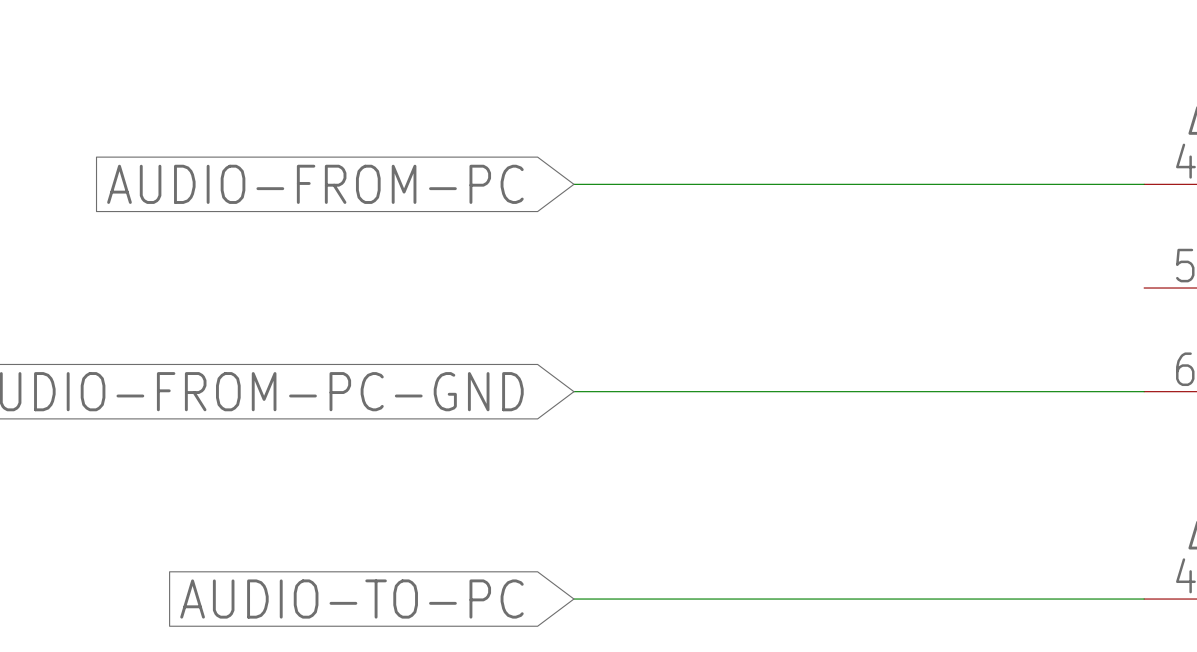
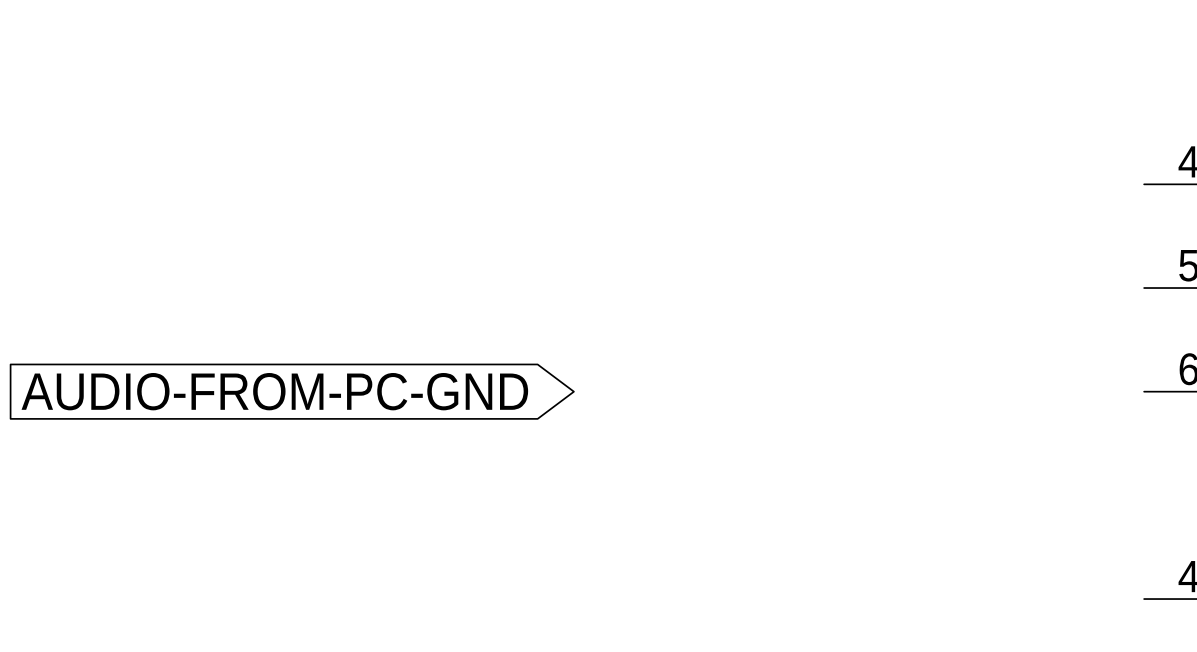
global label: AUDIO-FROM-PC (315, 184) -> none
wire: (573, 184) (1144, 184) -> none
wire: (573, 391) (1144, 391) -> none
global label: AUDIO-TO-PC (351, 599) -> none
wire: (573, 599) (1144, 599) -> none

